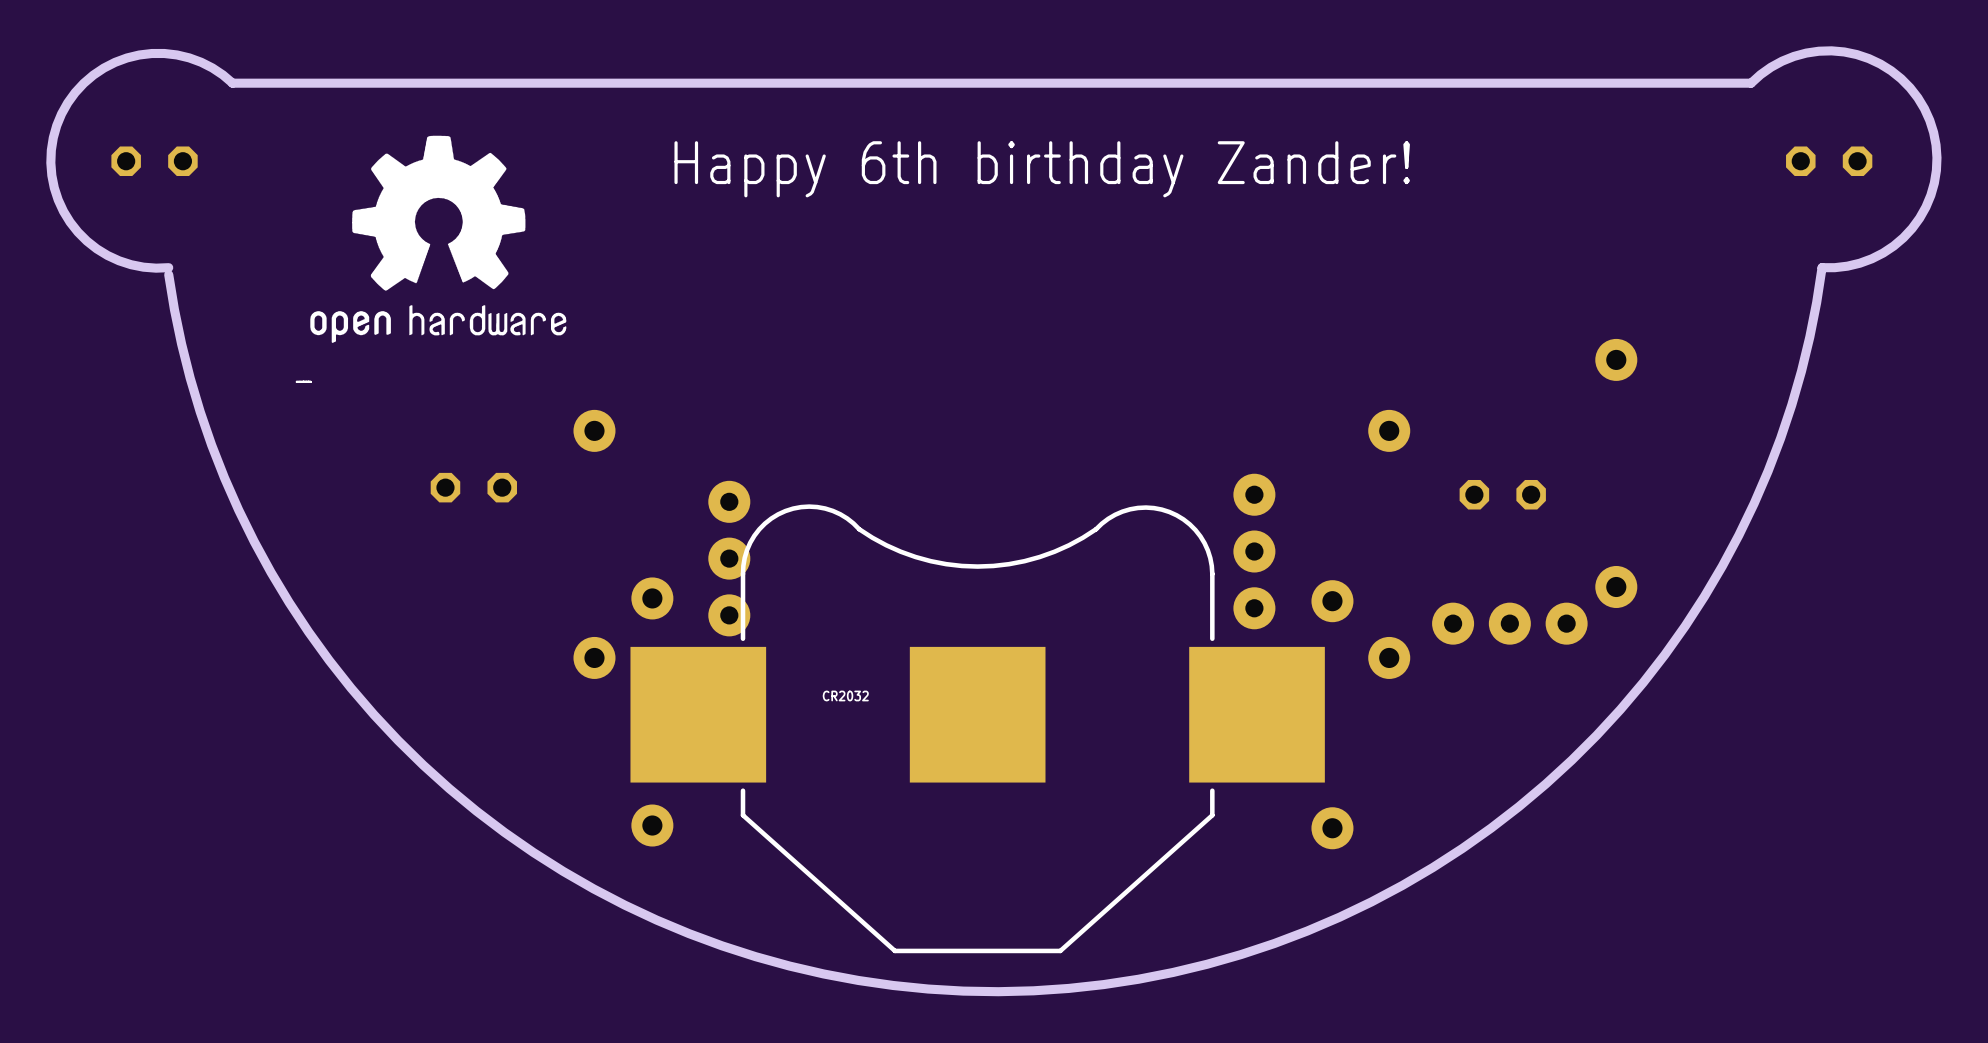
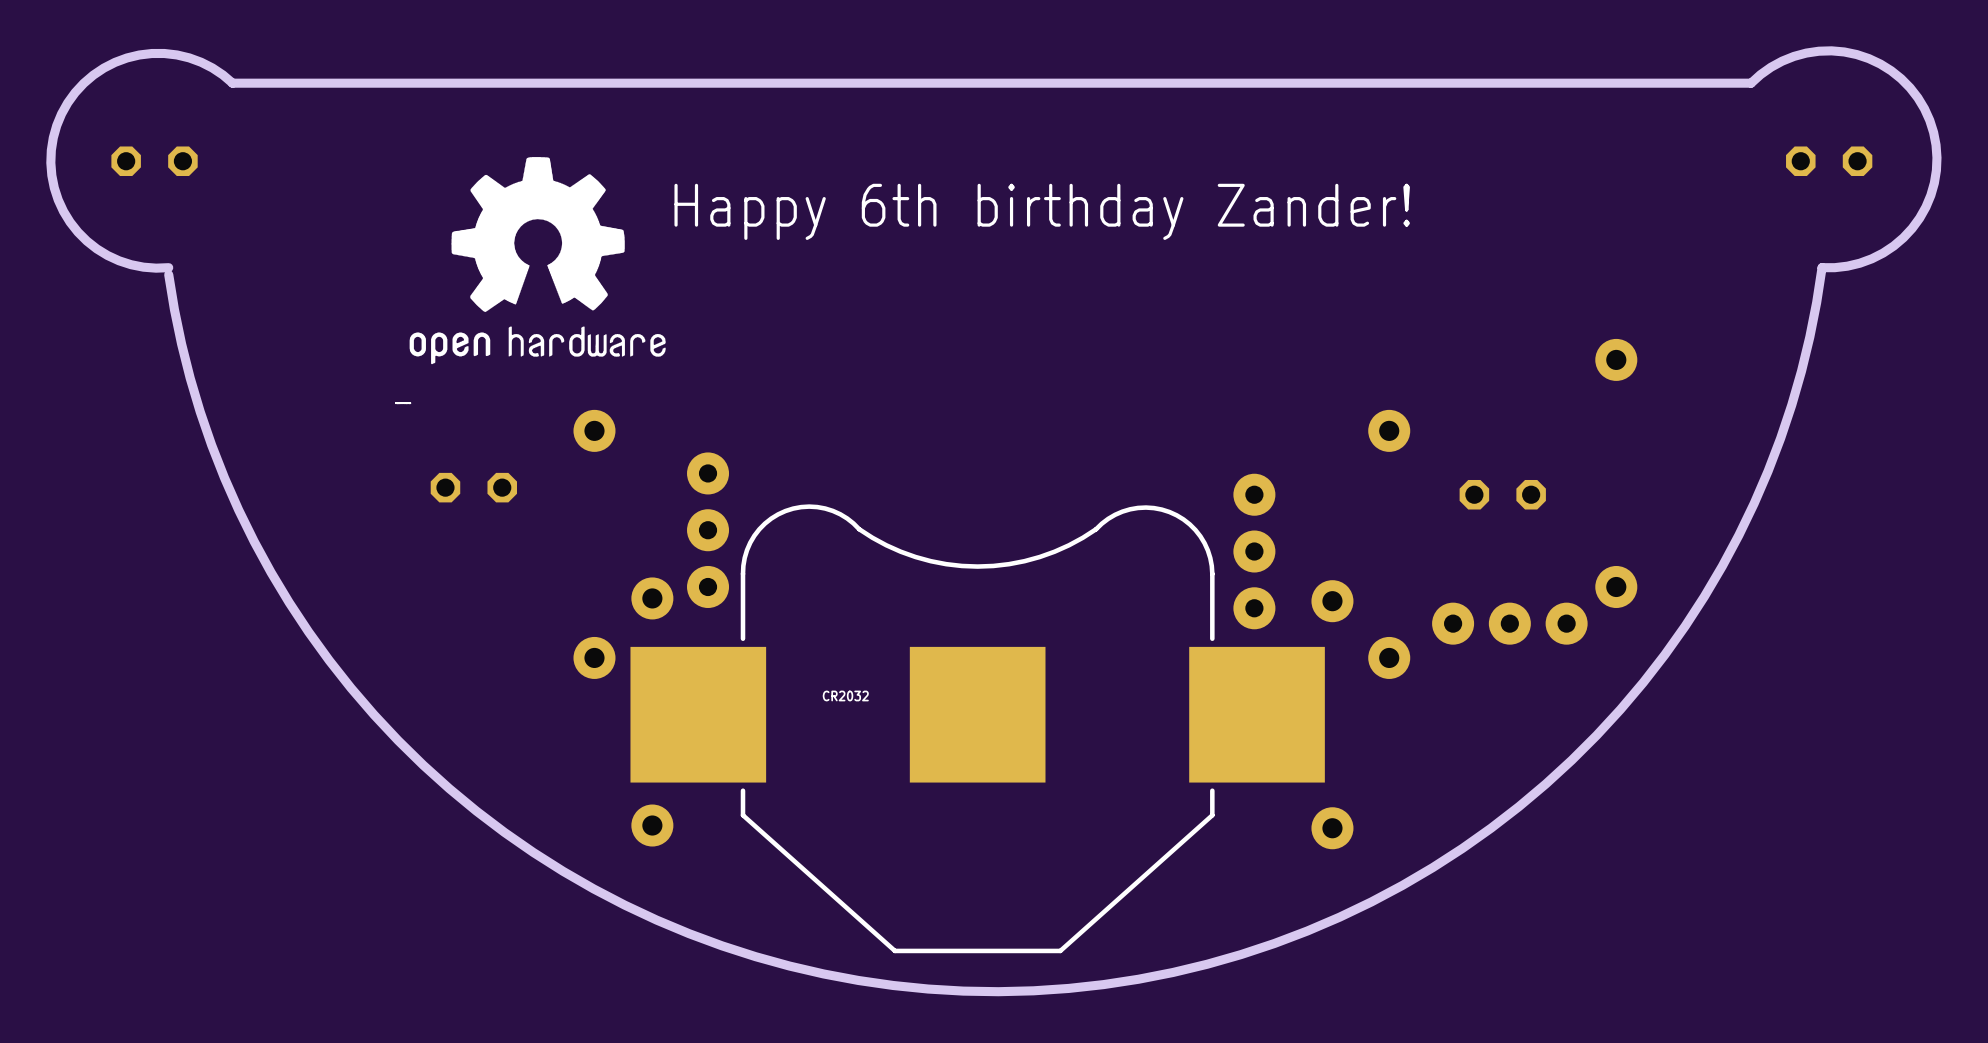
text position: Happy 6th birthday Zander! (1042, 169) -> Happy 6th birthday Zander! (1042, 211)
drawing position: (438, 239) -> (537, 260)
part position: (729, 558) -> (708, 530)

